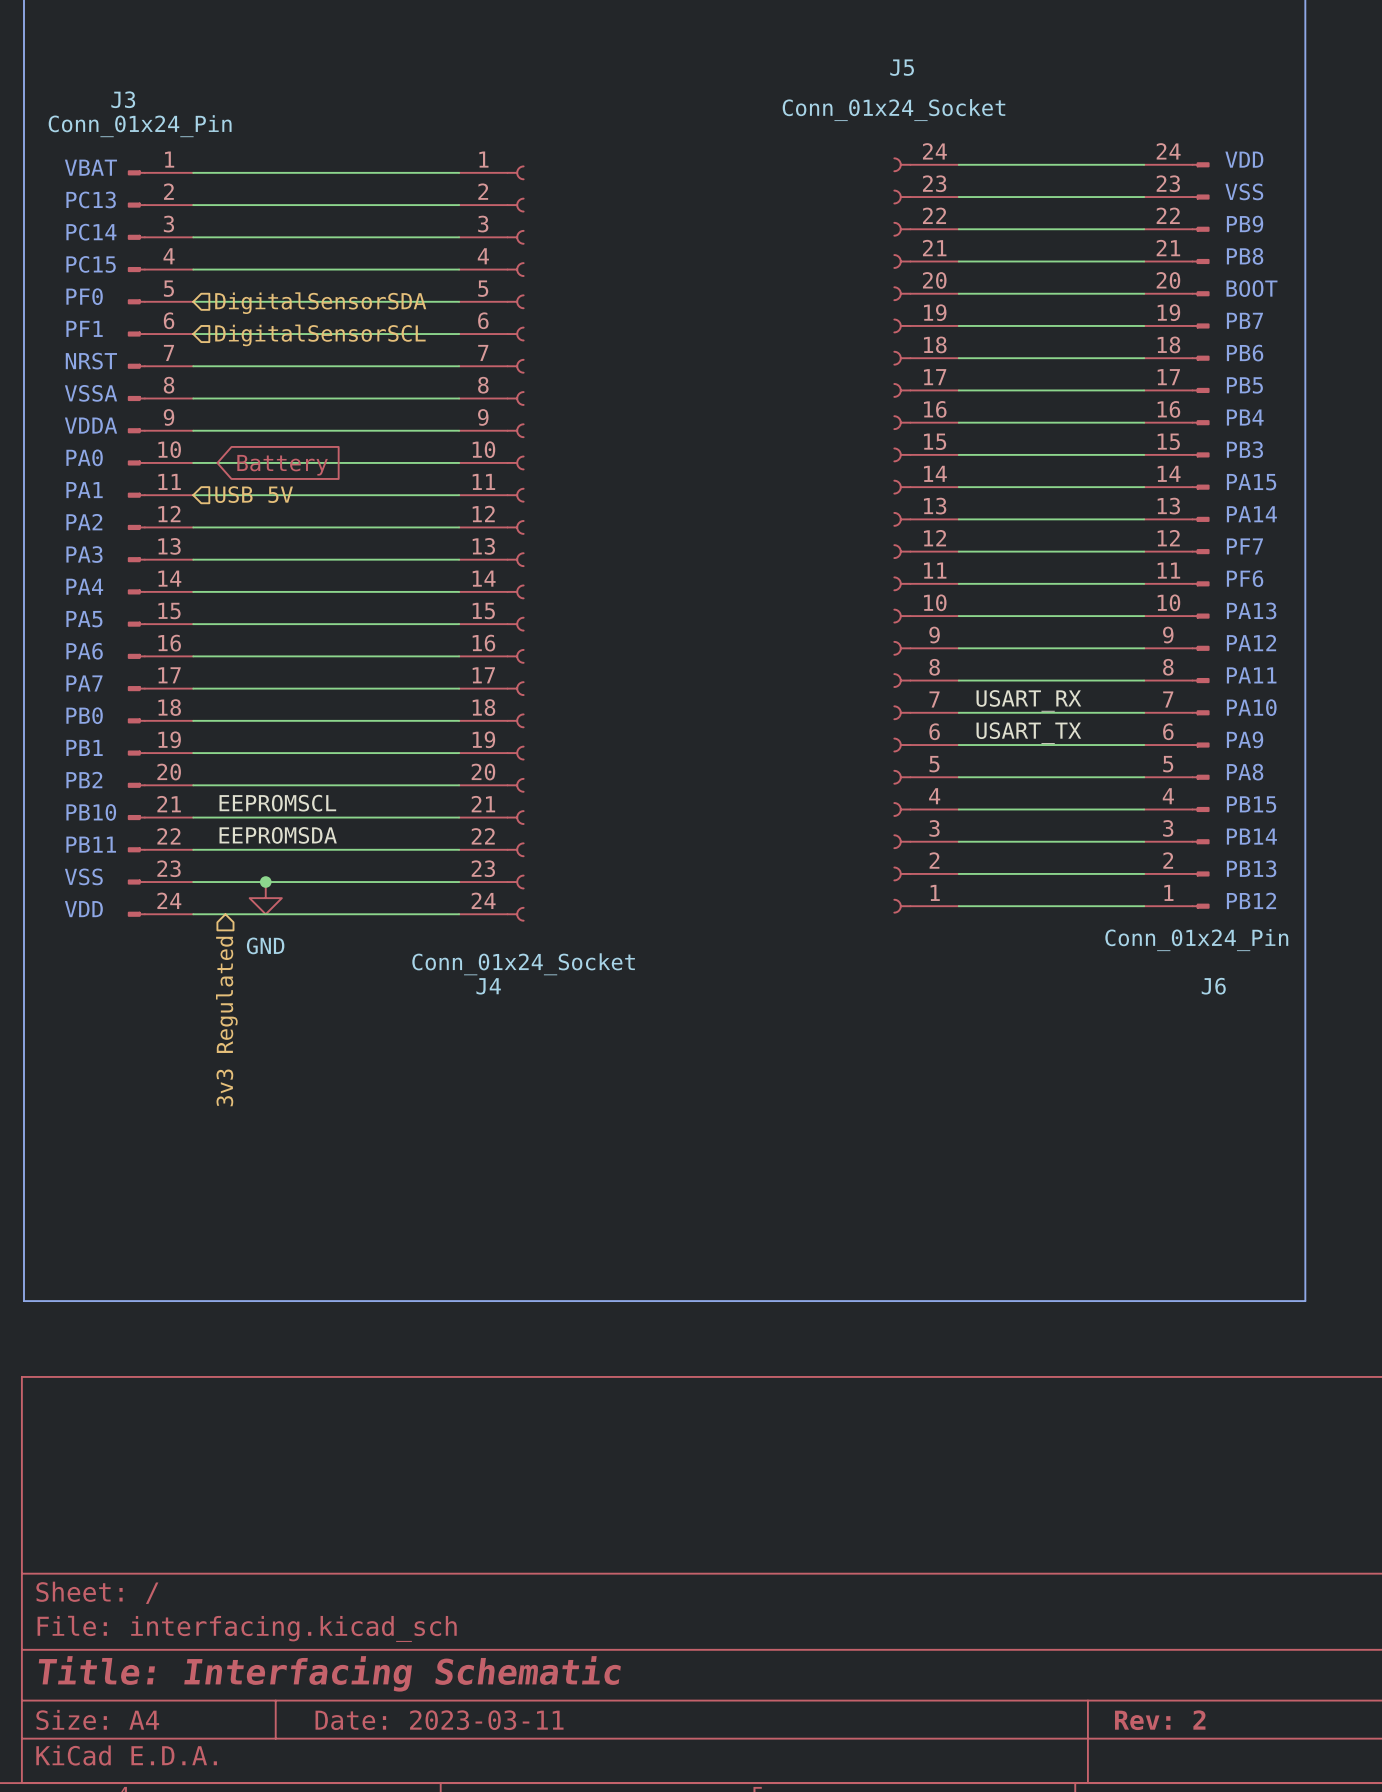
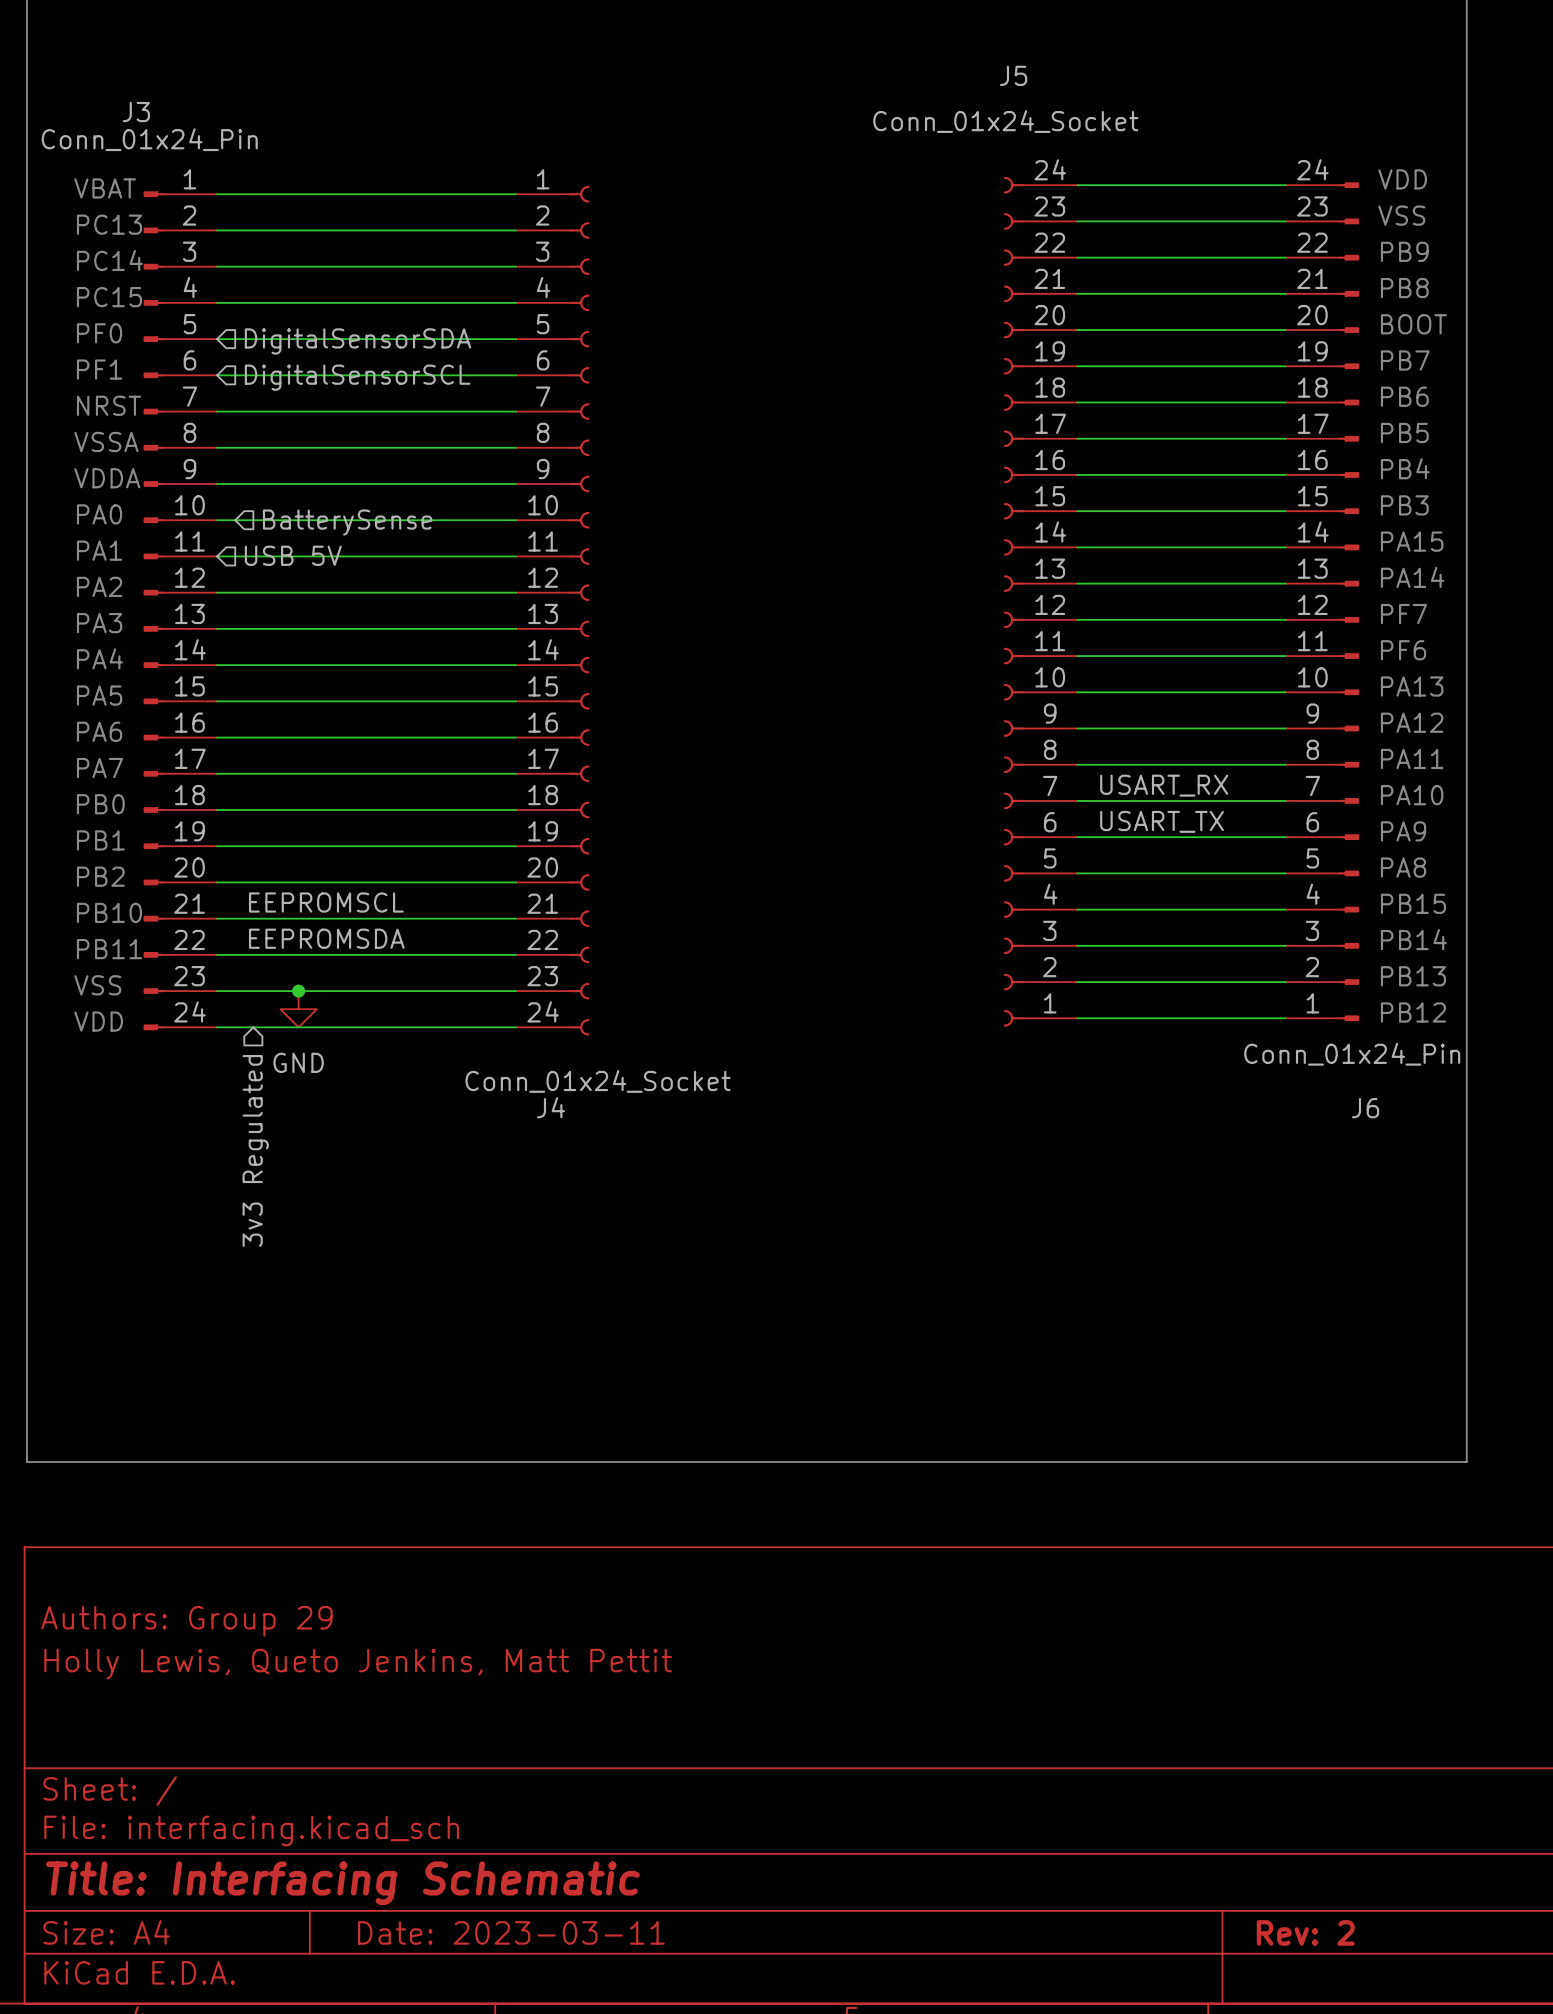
hierarchical label: none -> BatterySense (347, 522)
global label: Battery (282, 465) -> none
title block: none -> Authors: Group 29 (186, 1621)
title block: none -> Holly Lewis, Queto Jenkins, Matt Pettit (358, 1664)

